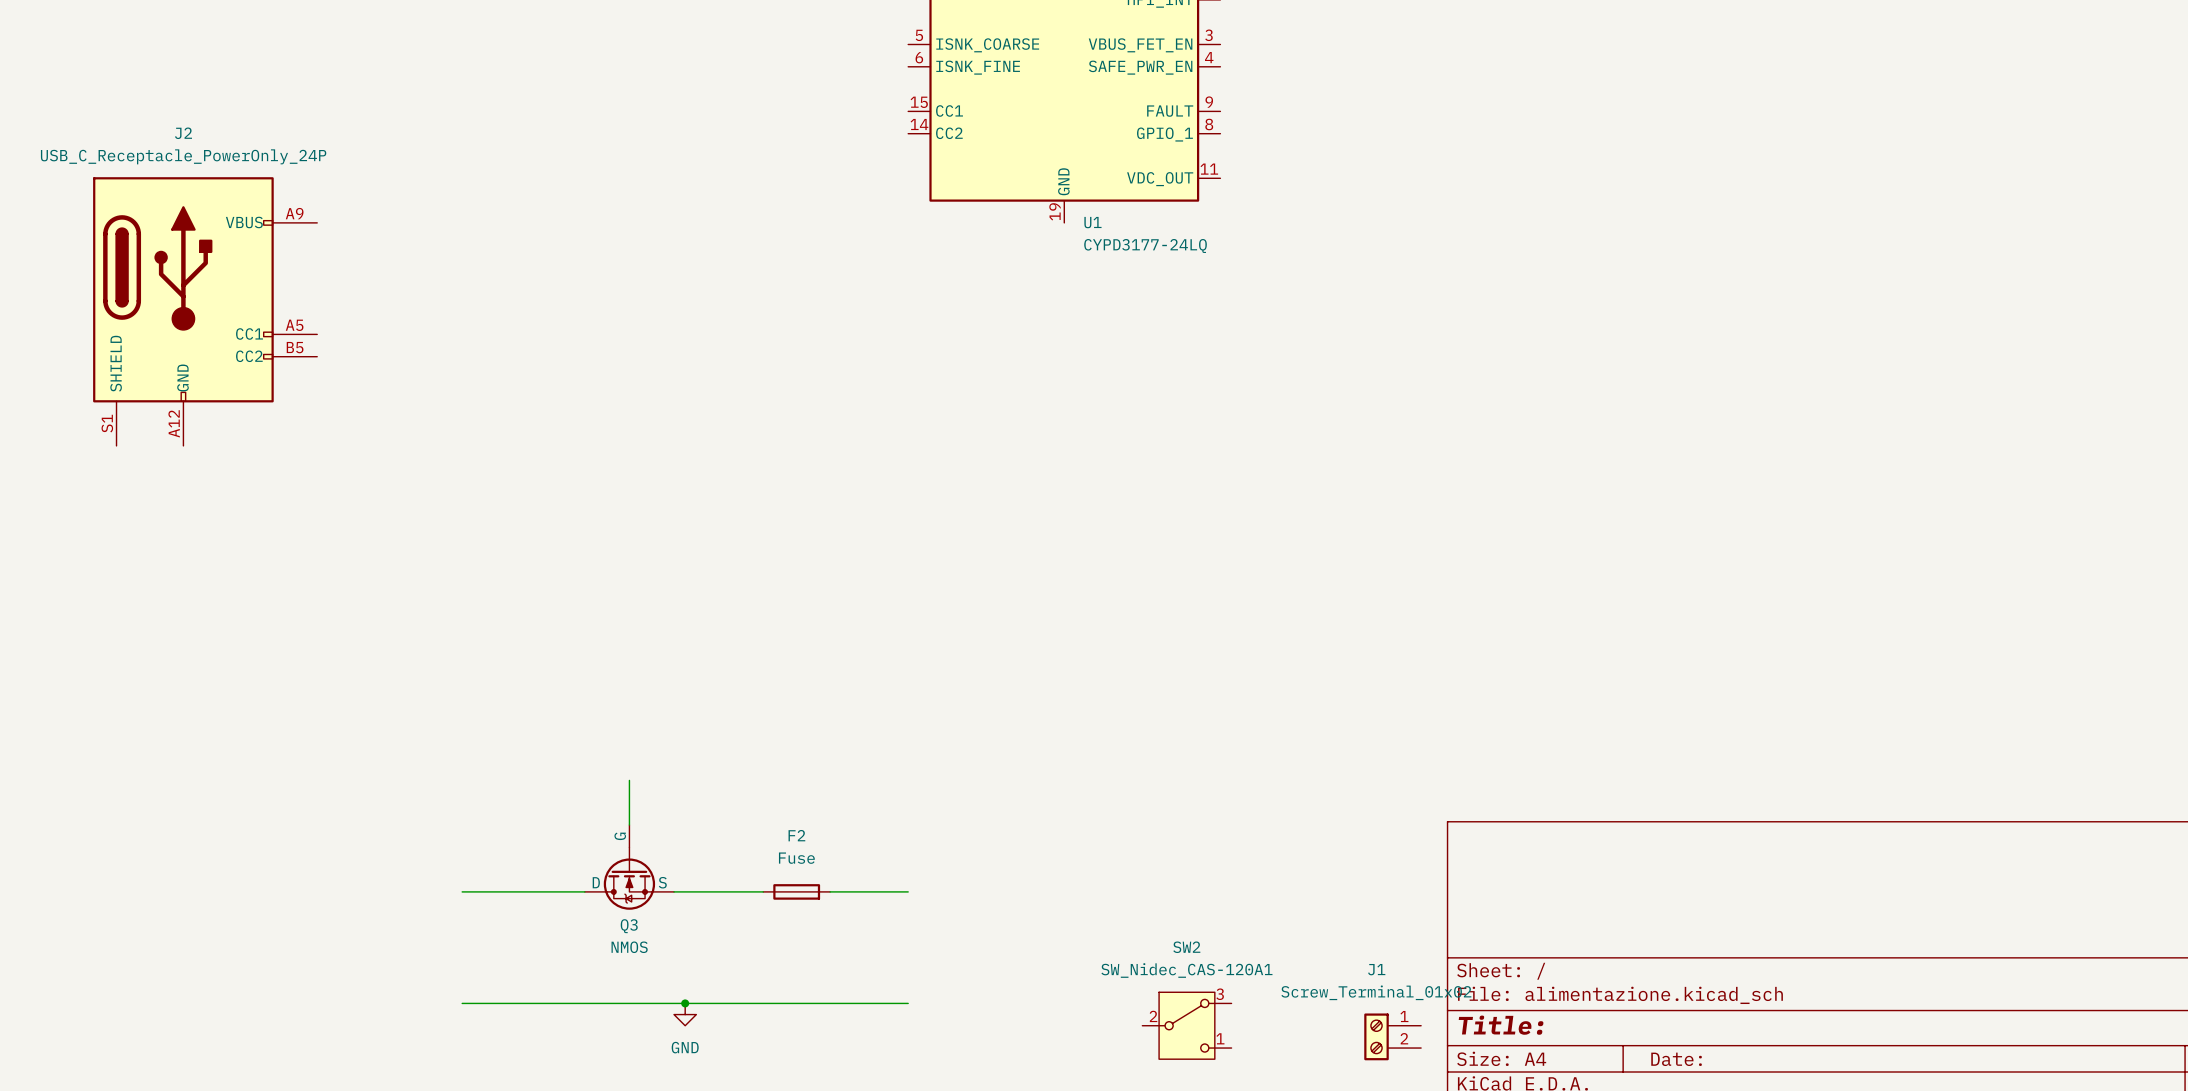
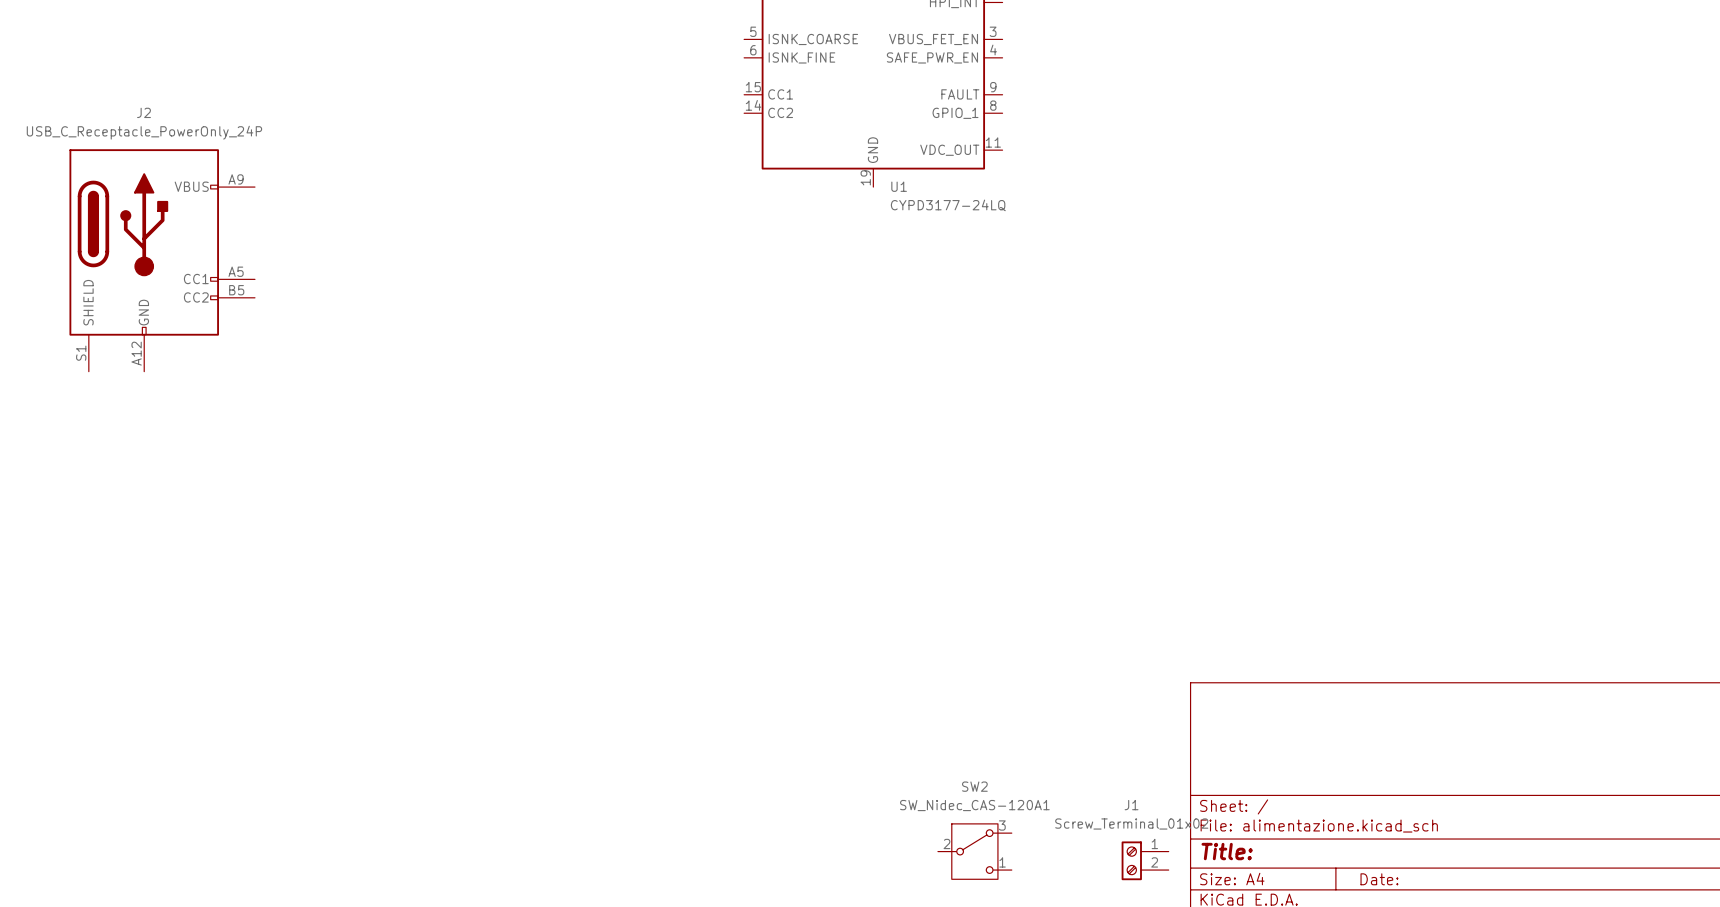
wire: (629, 780) (629, 825) -> none
Q3: NMOS (629, 867) -> none
wire: (462, 891) (584, 891) -> none
wire: (674, 891) (763, 891) -> none
F2: Fuse (796, 891) -> none
wire: (830, 891) (908, 891) -> none
wire: (462, 1003) (908, 1003) -> none
junction: (685, 1003) -> none
power symbol: GND (685, 1014) -> none

